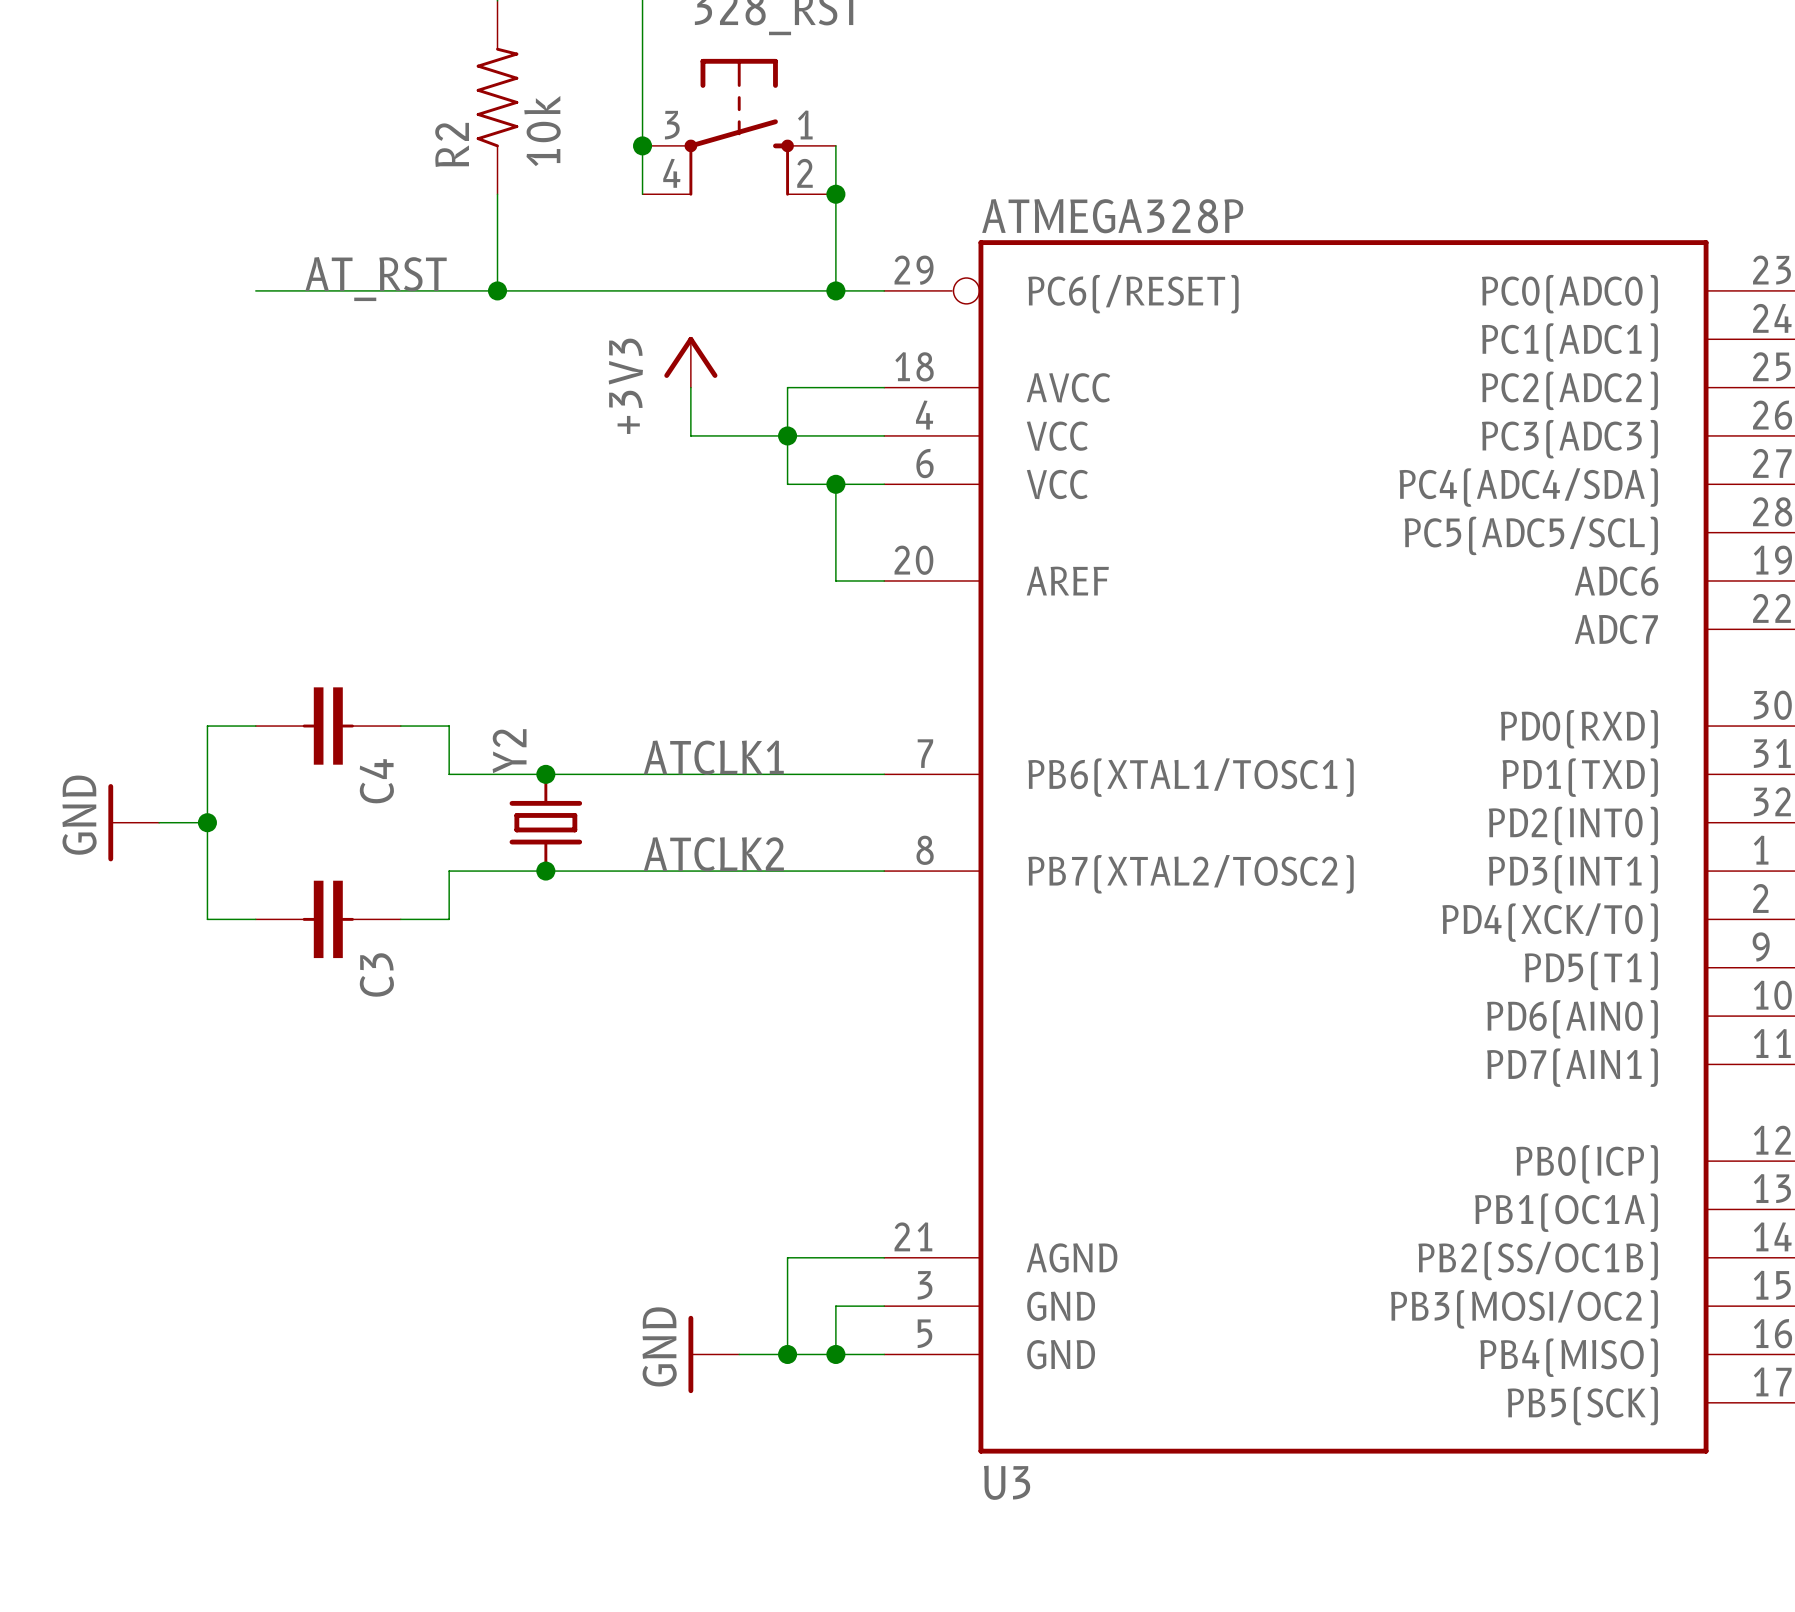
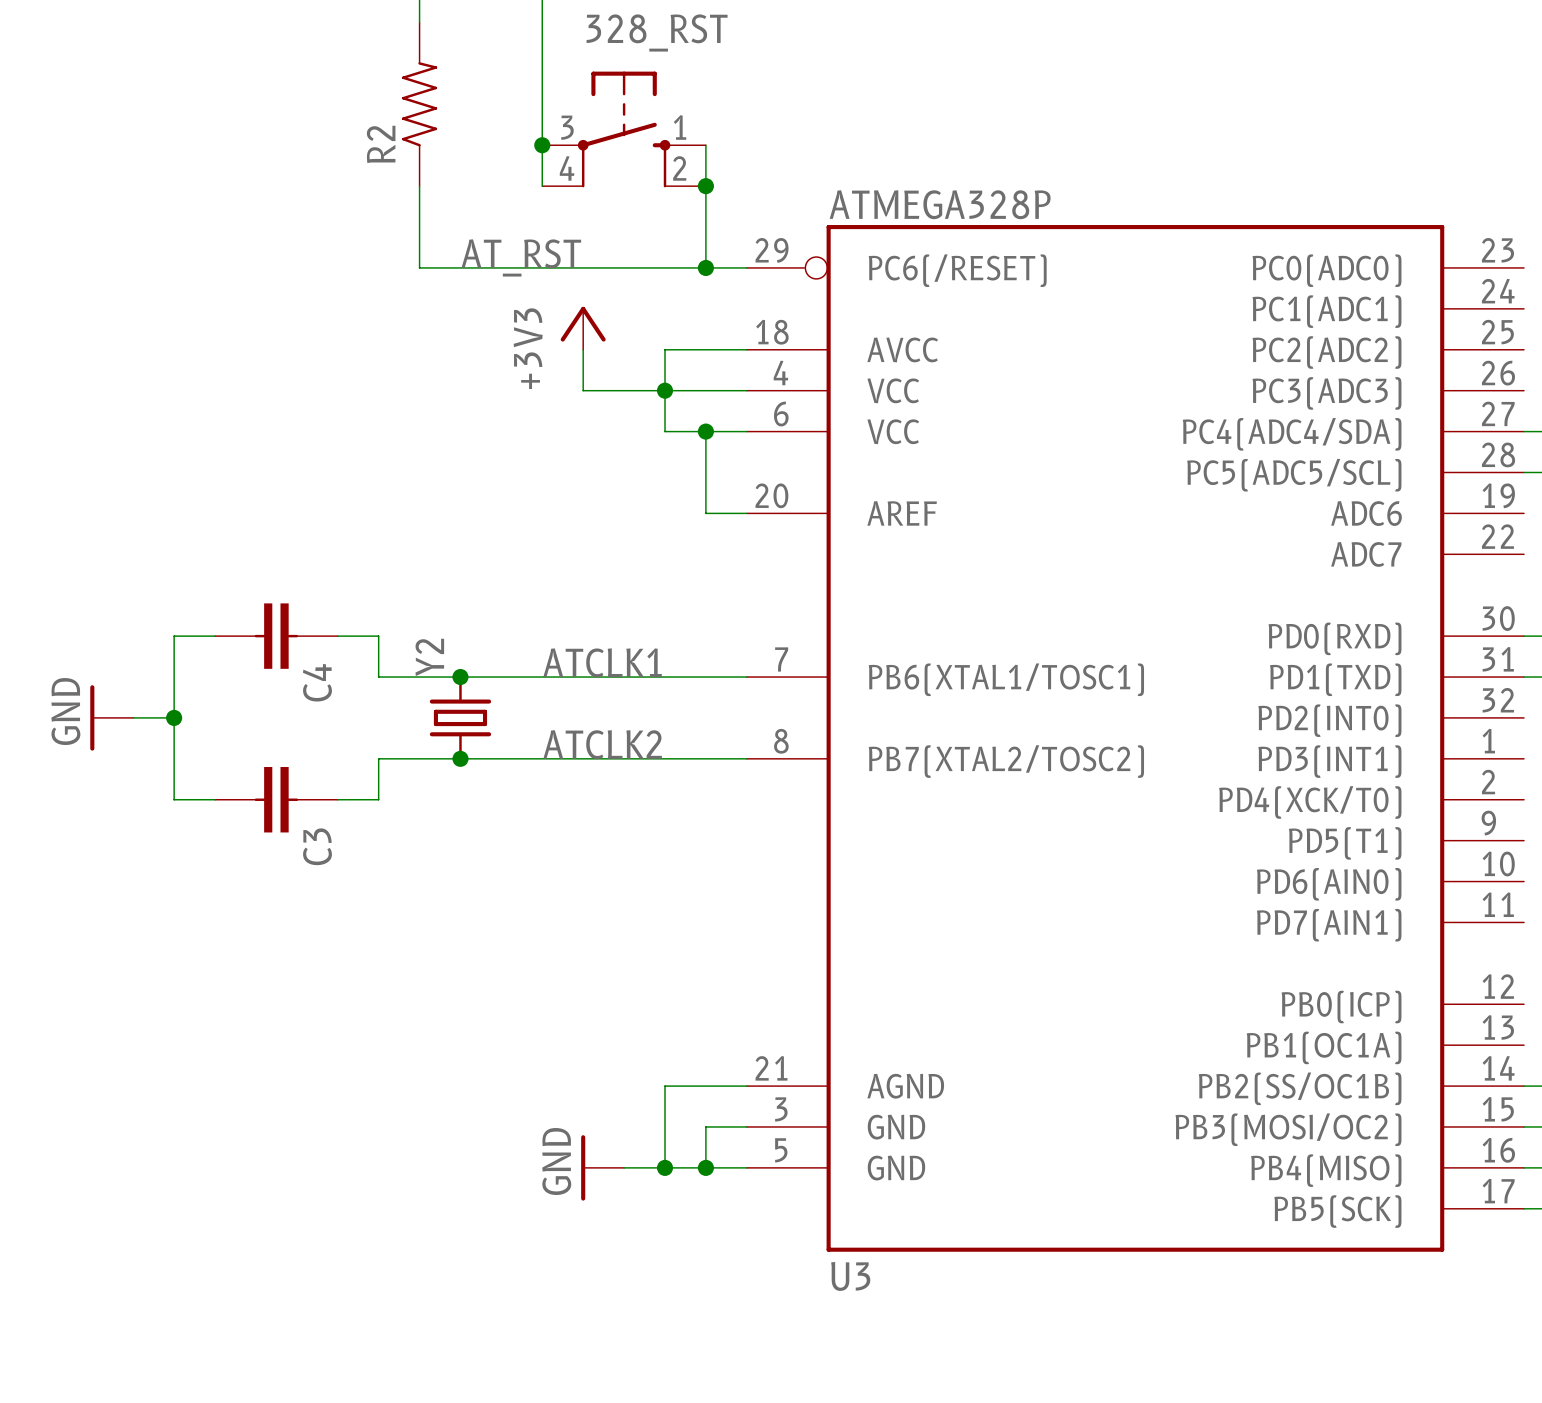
R2 value: 10k (542, 131) -> none
label position: AT_RST (376, 279) -> AT_RST (521, 257)
wire: (255, 290) (497, 290) -> none
junction: (497, 290) -> none

